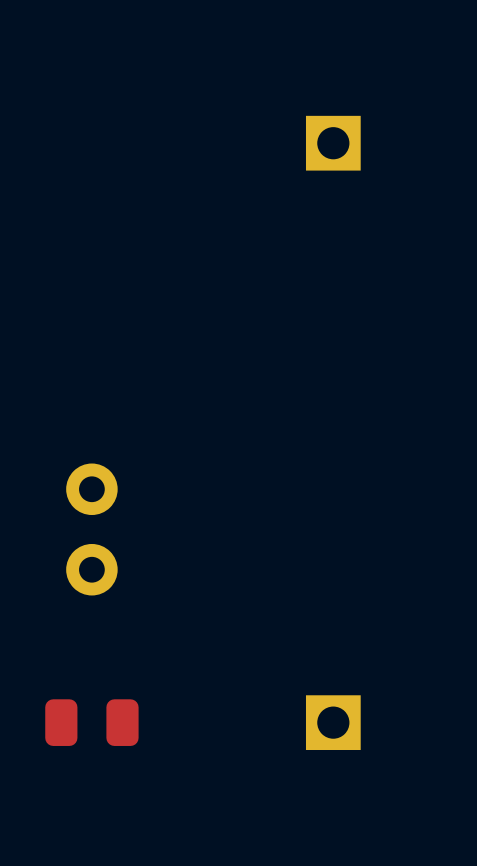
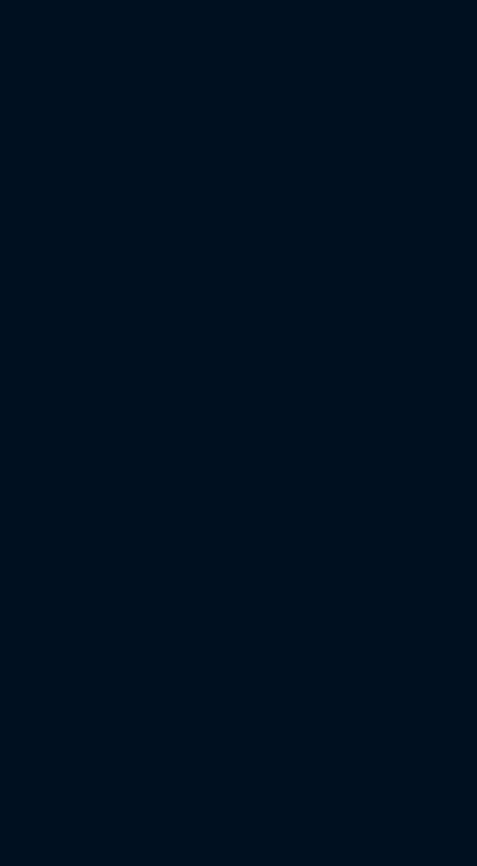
part: (333, 143) -> none
part: (91, 529) -> none
part: (91, 722) -> none
part: (333, 722) -> none

